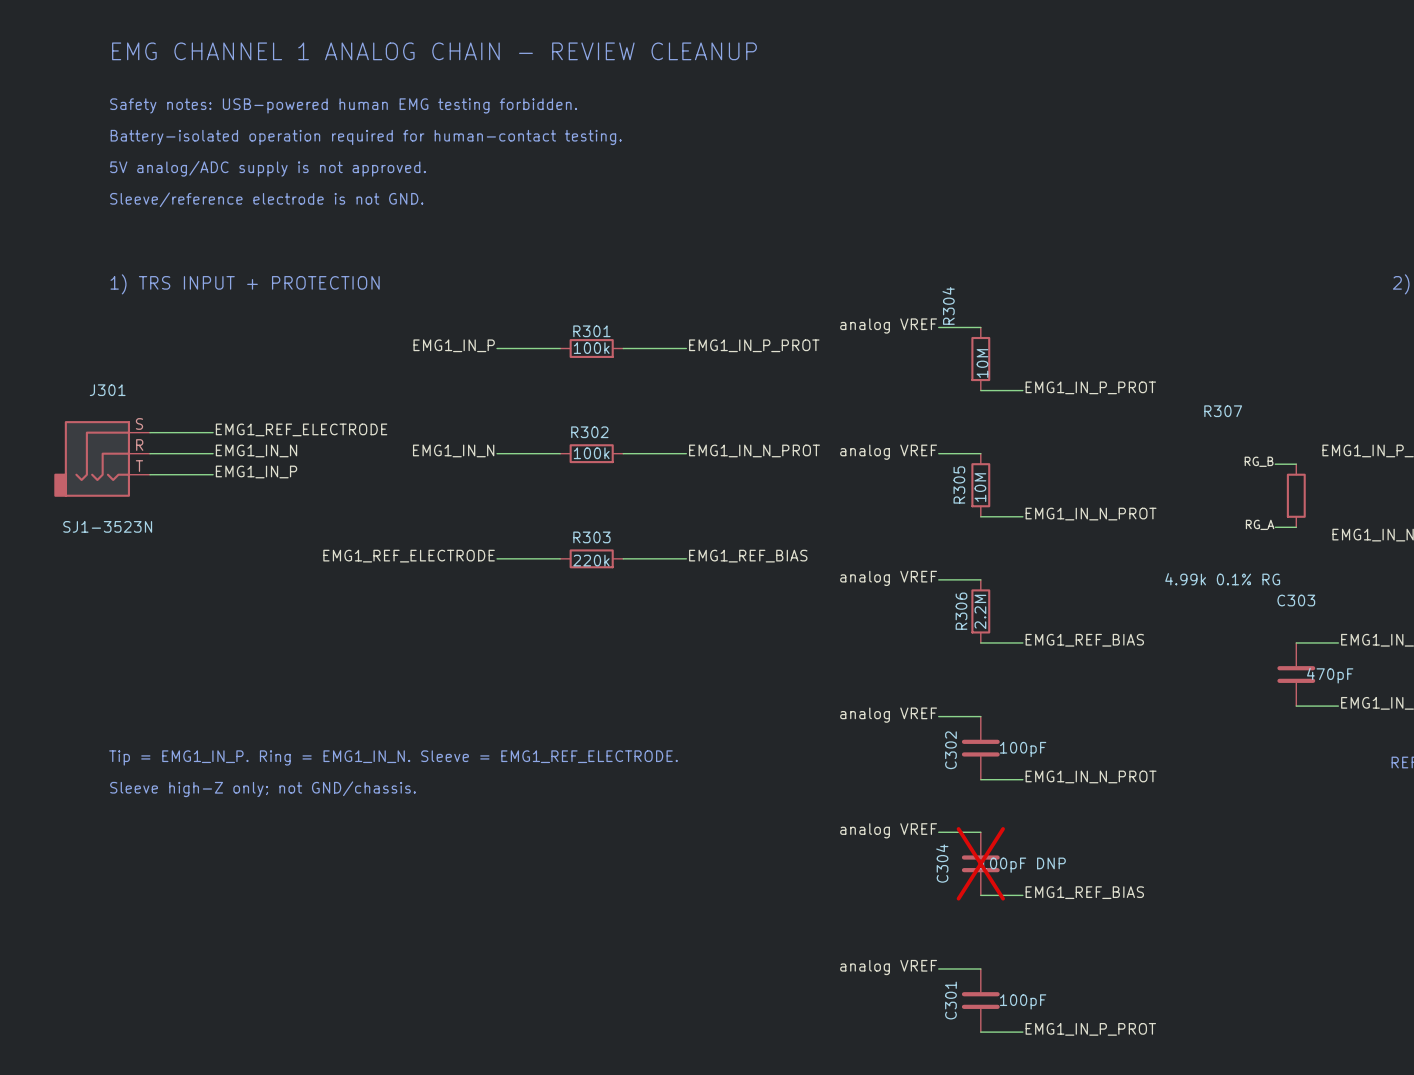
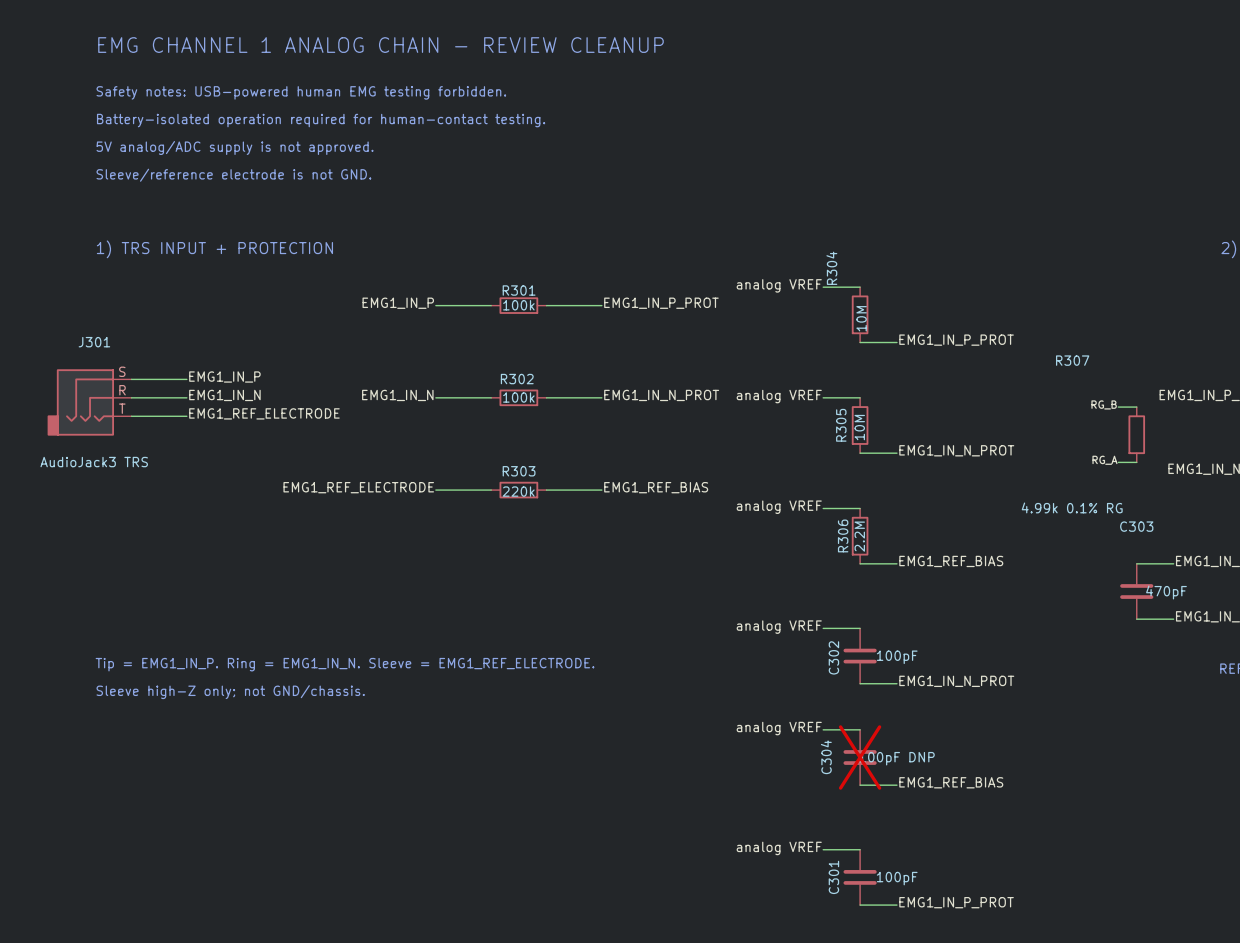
label: EMG1_REF_ELECTRODE (301, 429) -> EMG1_IN_P (224, 377)
label: EMG1_IN_P (256, 471) -> EMG1_REF_ELECTRODE (264, 413)
J301 value: SJ1-3523N (107, 526) -> AudioJack3 TRS (94, 462)

